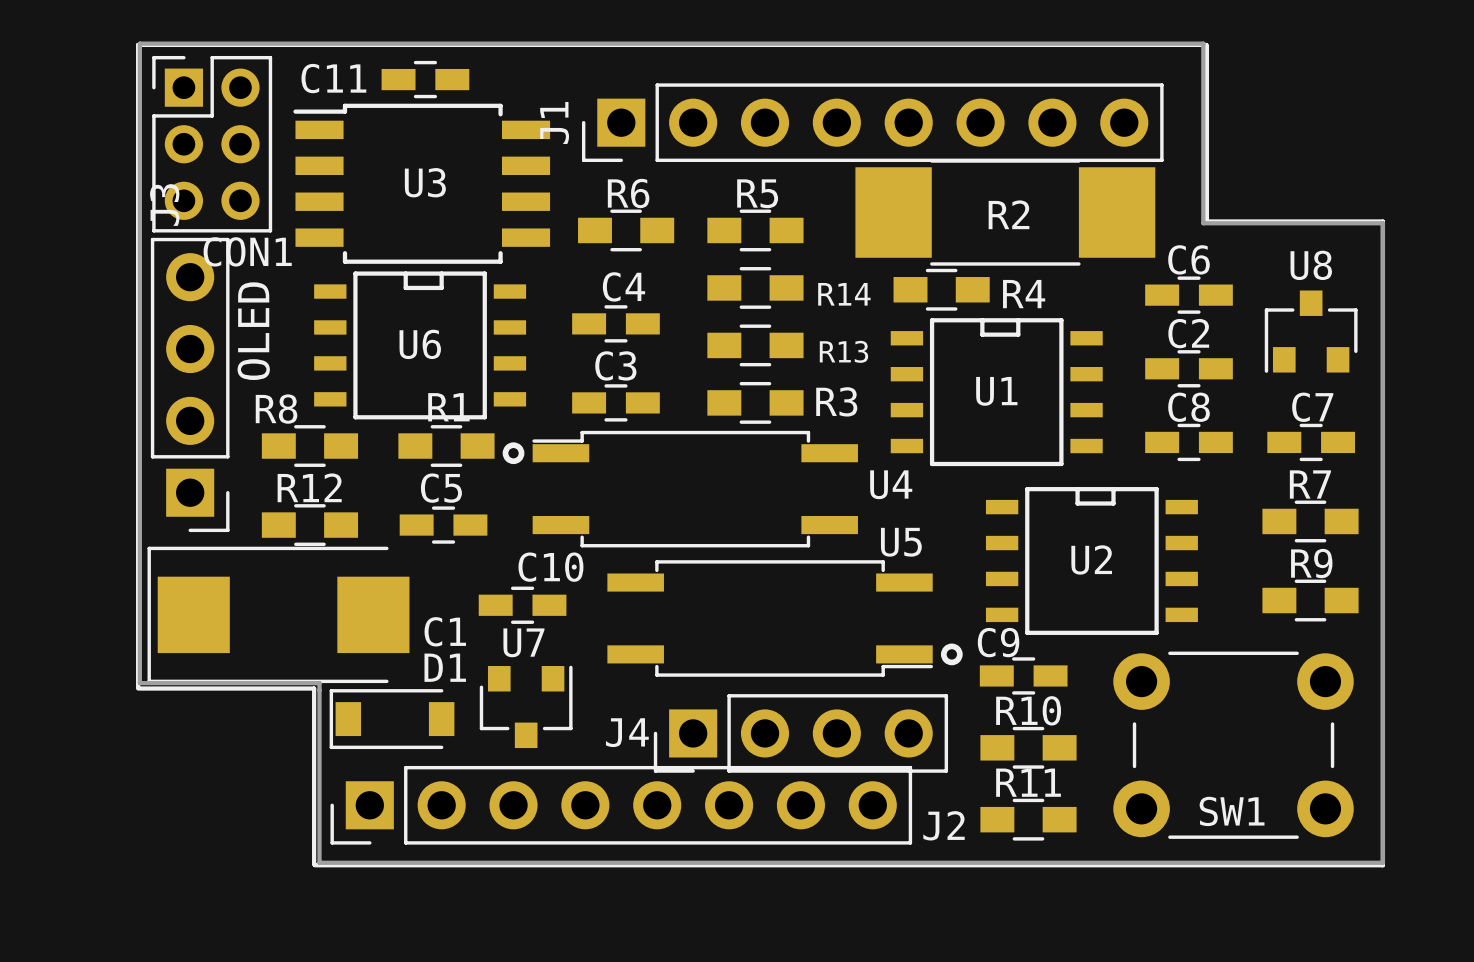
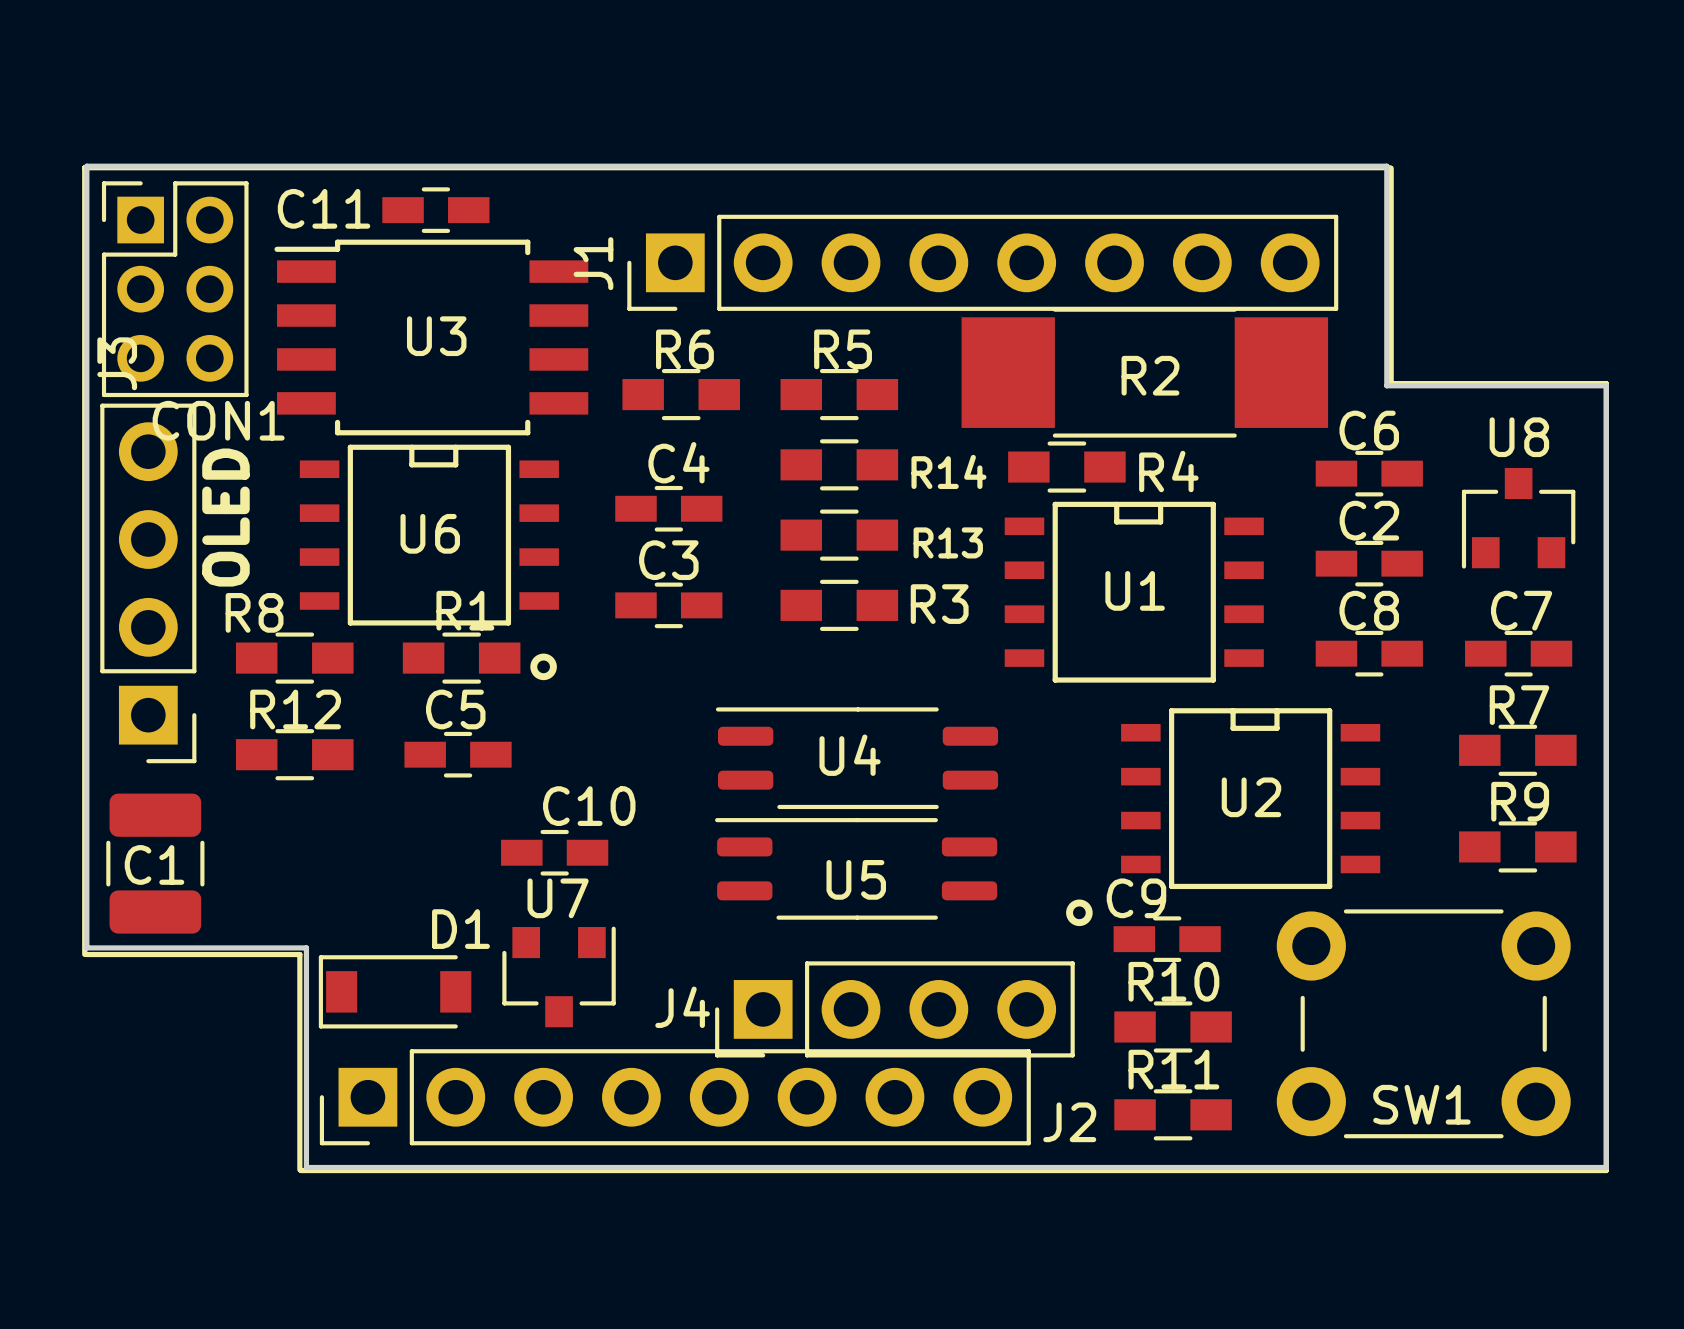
U4 footprint: [532, 430, 858, 548] -> [715, 707, 999, 810]
U4 name position: U4 (891, 484) -> U4 (850, 755)
U5 name position: U5 (901, 542) -> U5 (856, 879)
C1 footprint: [147, 546, 410, 684] -> [106, 793, 205, 934]
U5 footprint: [607, 560, 933, 677] -> [715, 818, 998, 920]
C1 name position: C1 (445, 631) -> C1 (154, 864)

